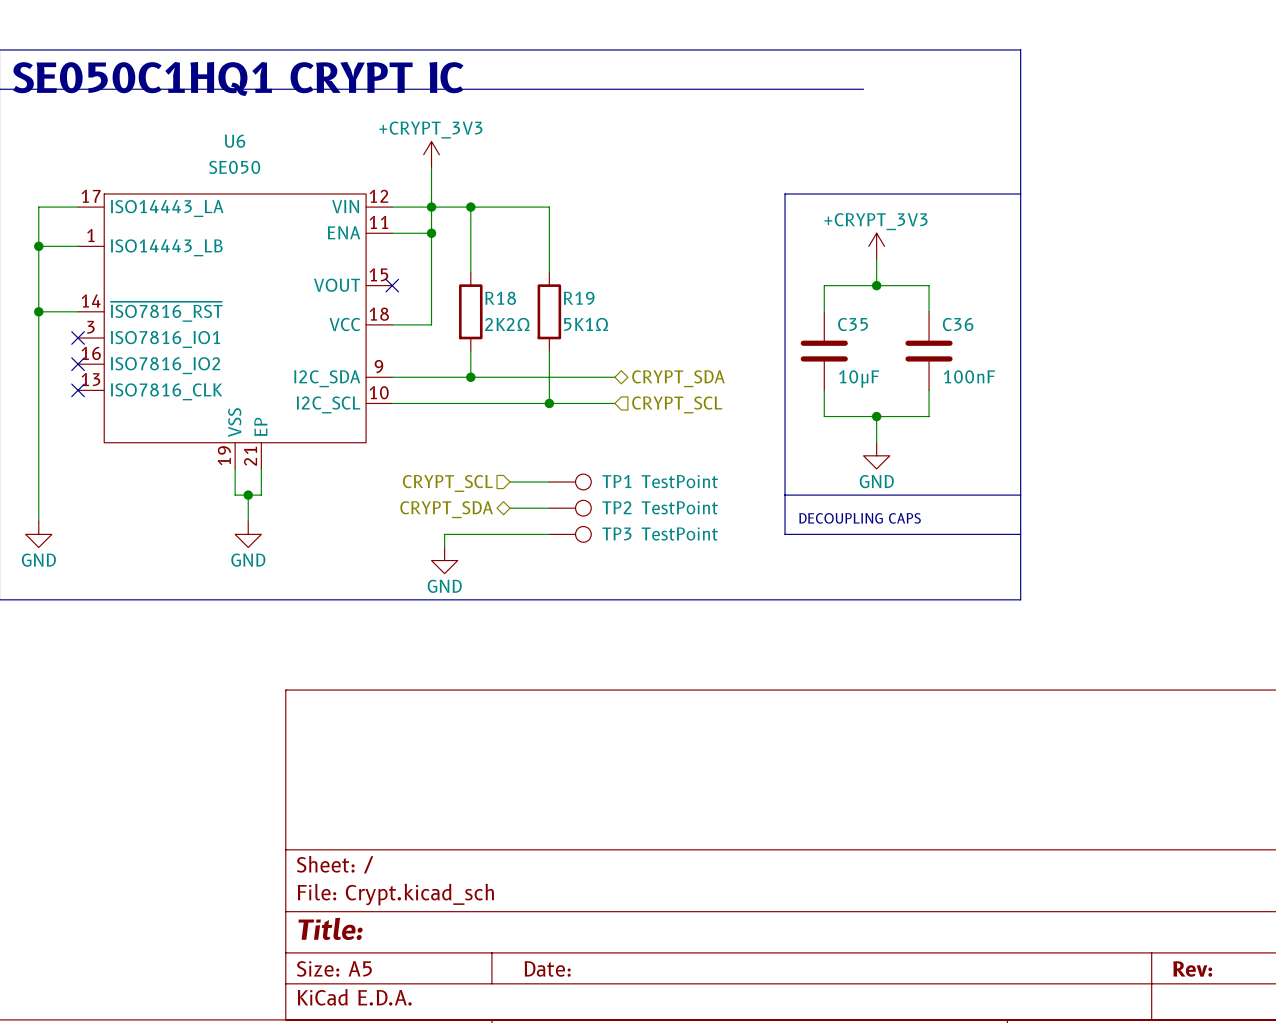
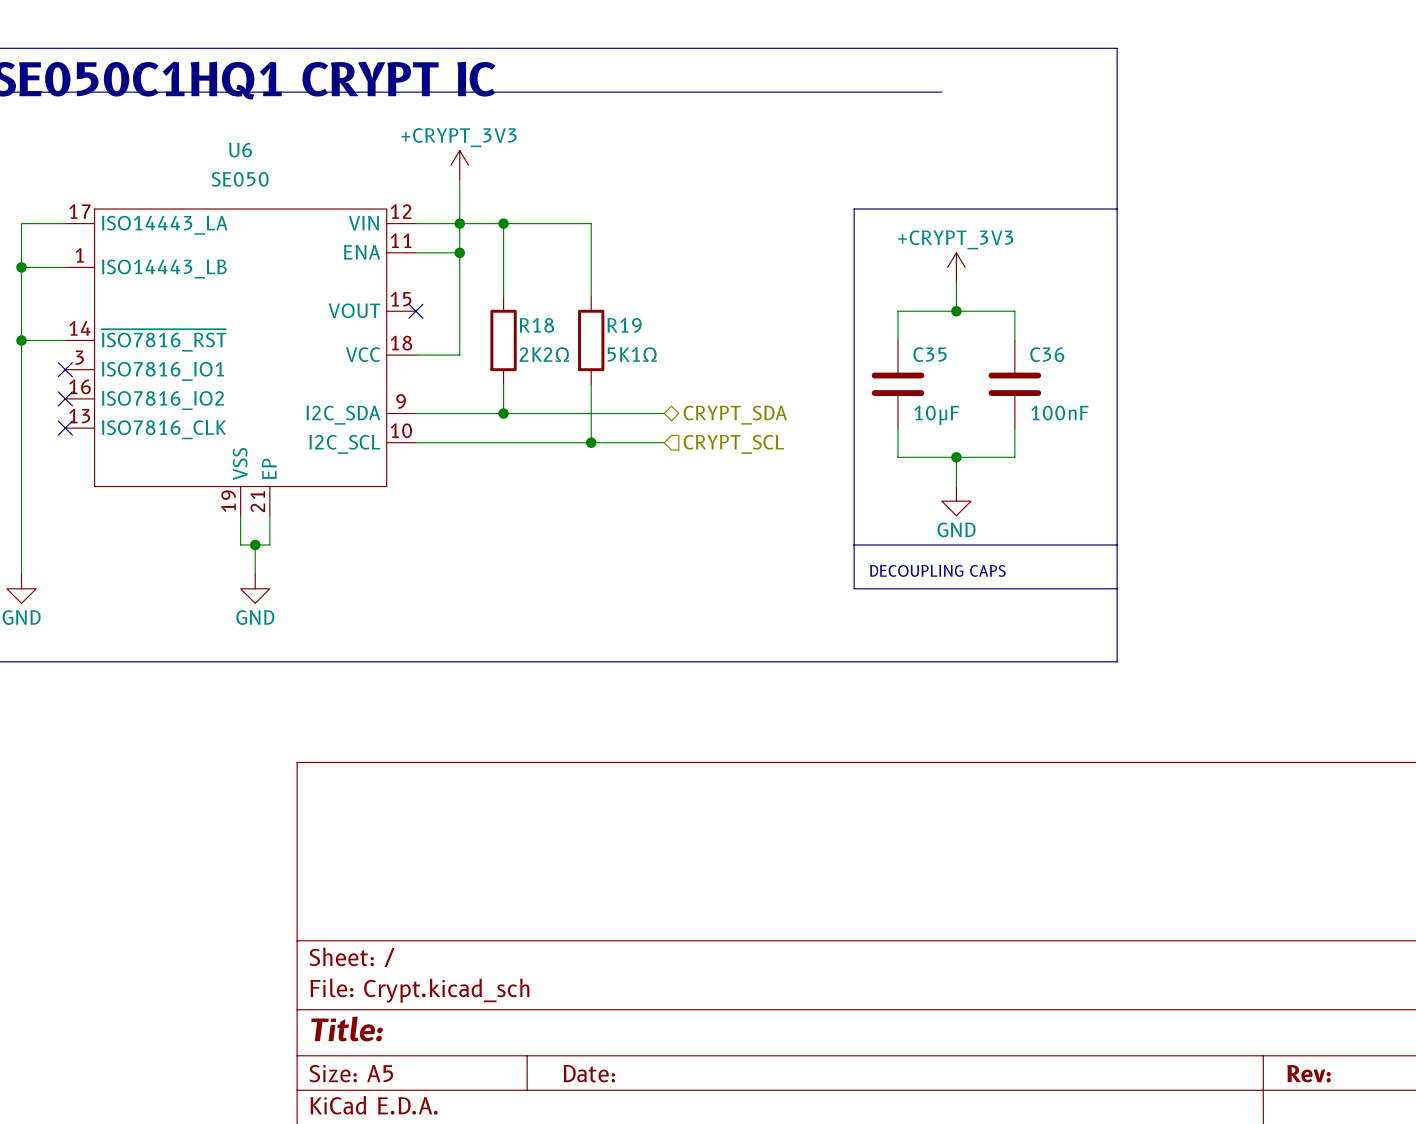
wire: (510, 482) (549, 482) -> none
TP1: TestPoint (570, 482) -> none
hierarchical label: CRYPT_SCL (447, 483) -> none
wire: (510, 508) (549, 508) -> none
TP2: TestPoint (570, 508) -> none
hierarchical label: CRYPT_SDA (446, 509) -> none
wire: (549, 534) (444, 534) (444, 547) -> none
TP3: TestPoint (570, 534) -> none
power symbol: GND (444, 560) -> none

